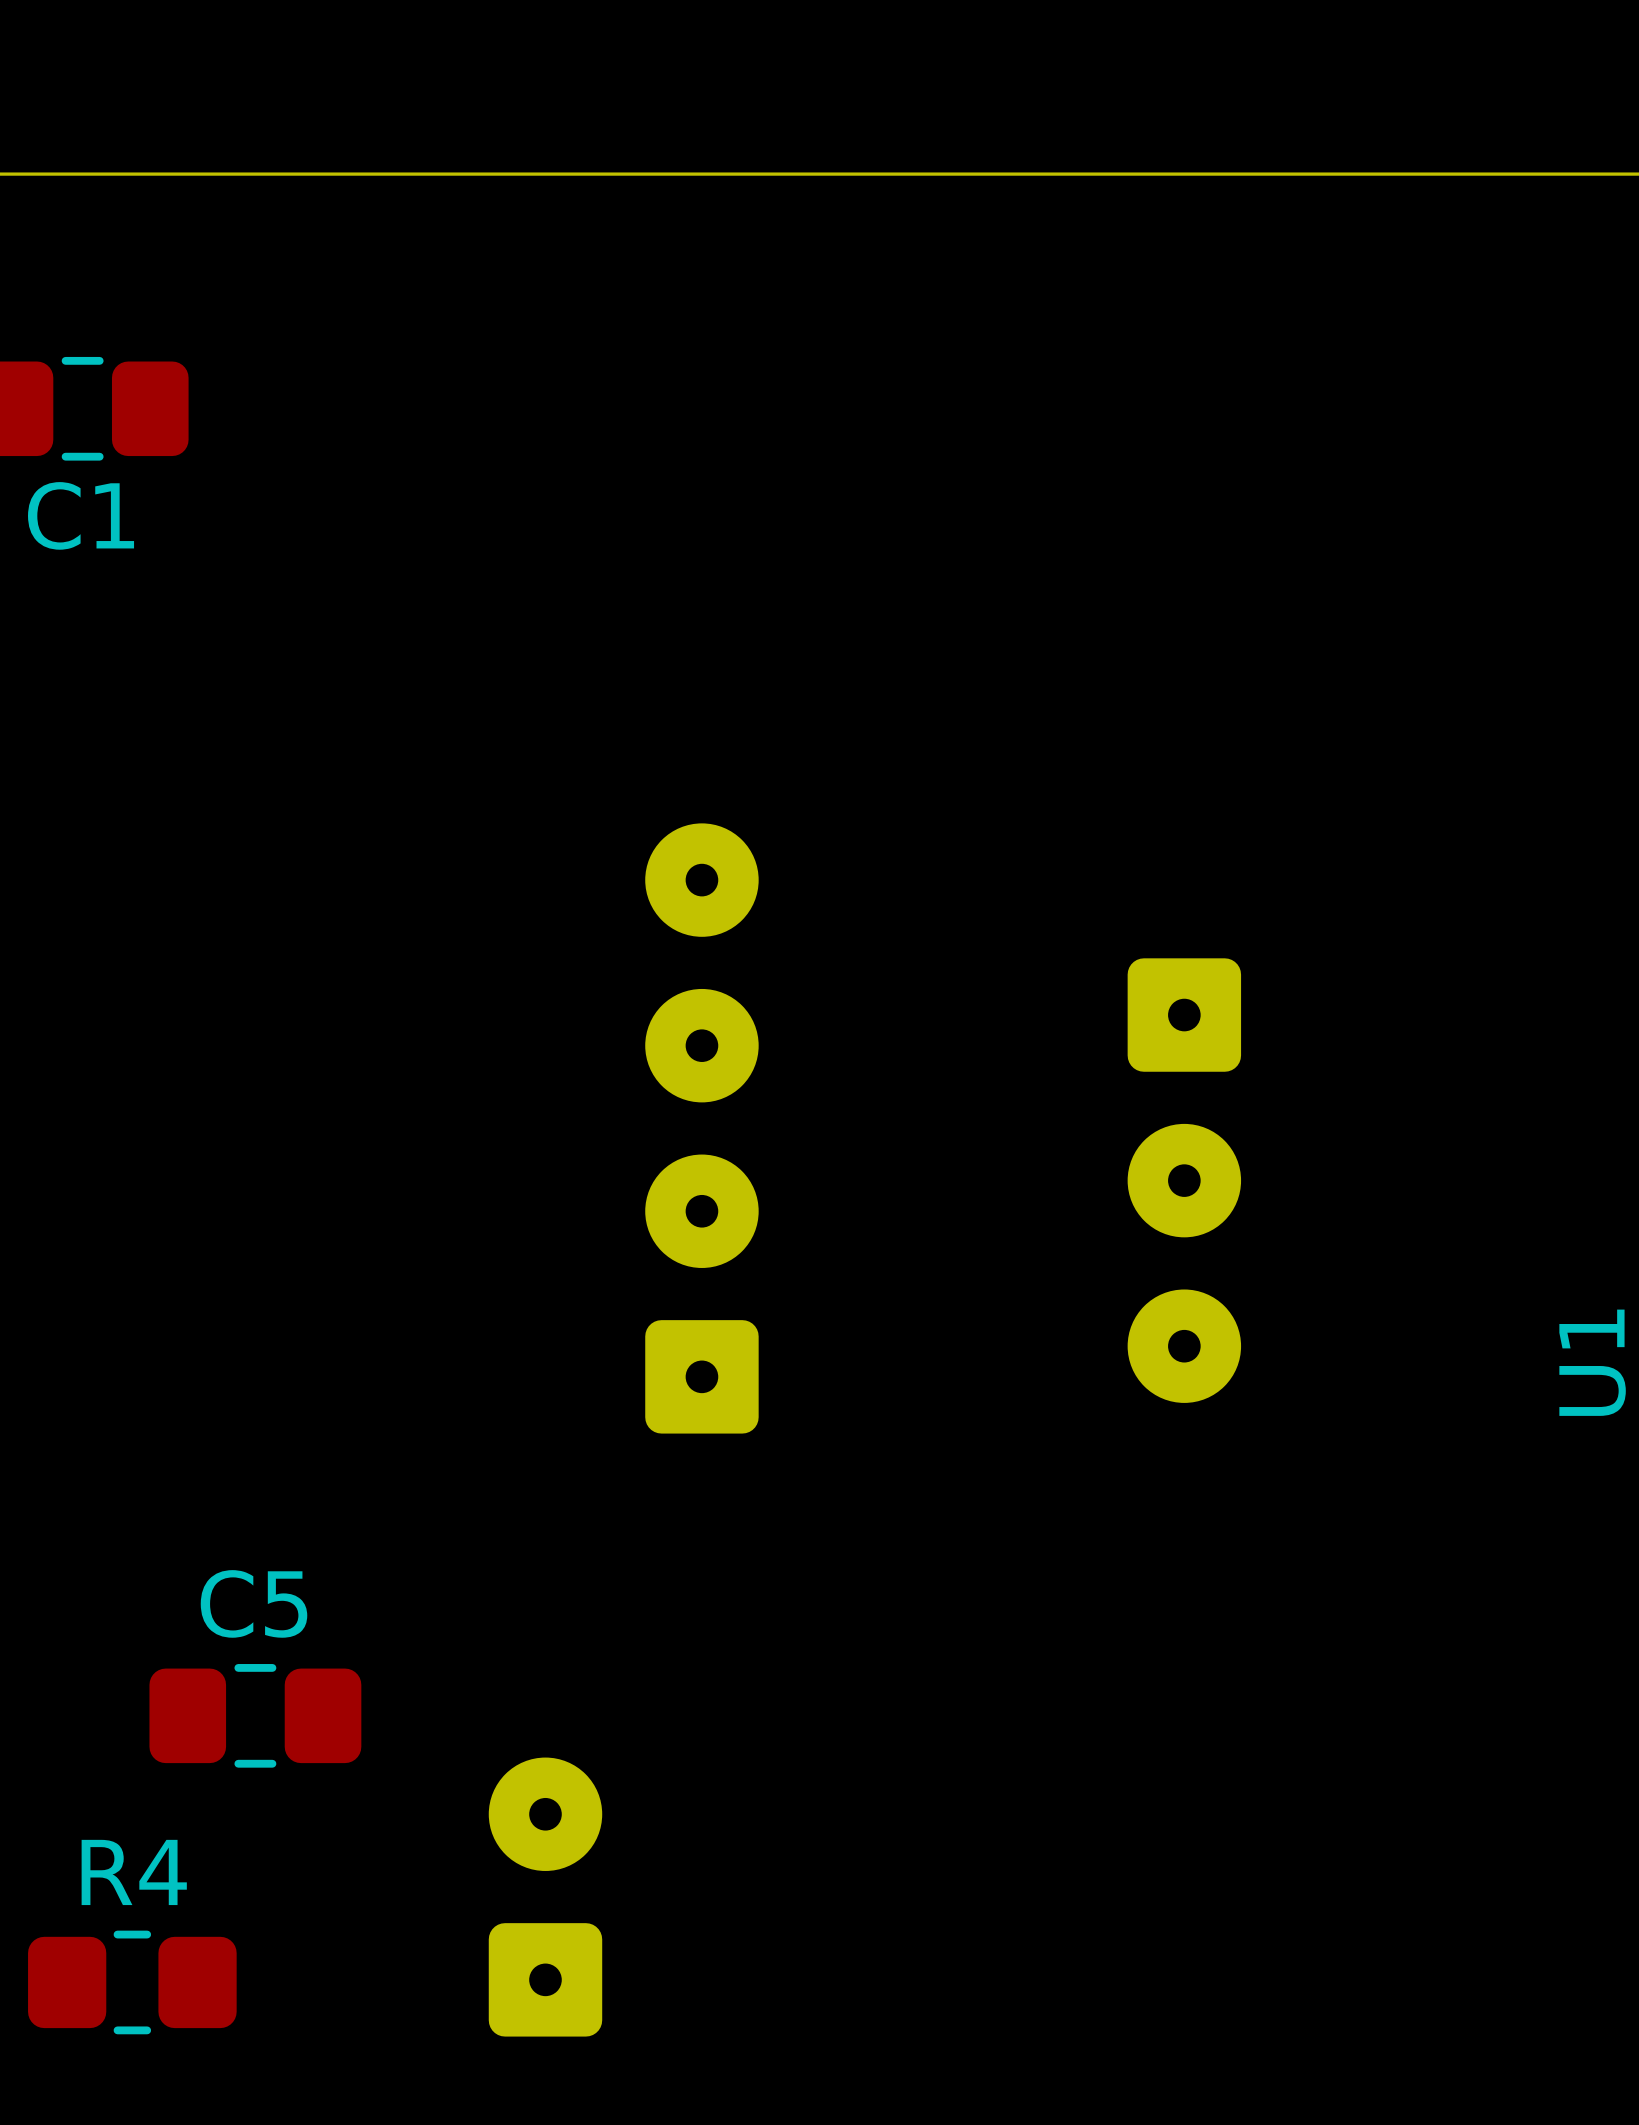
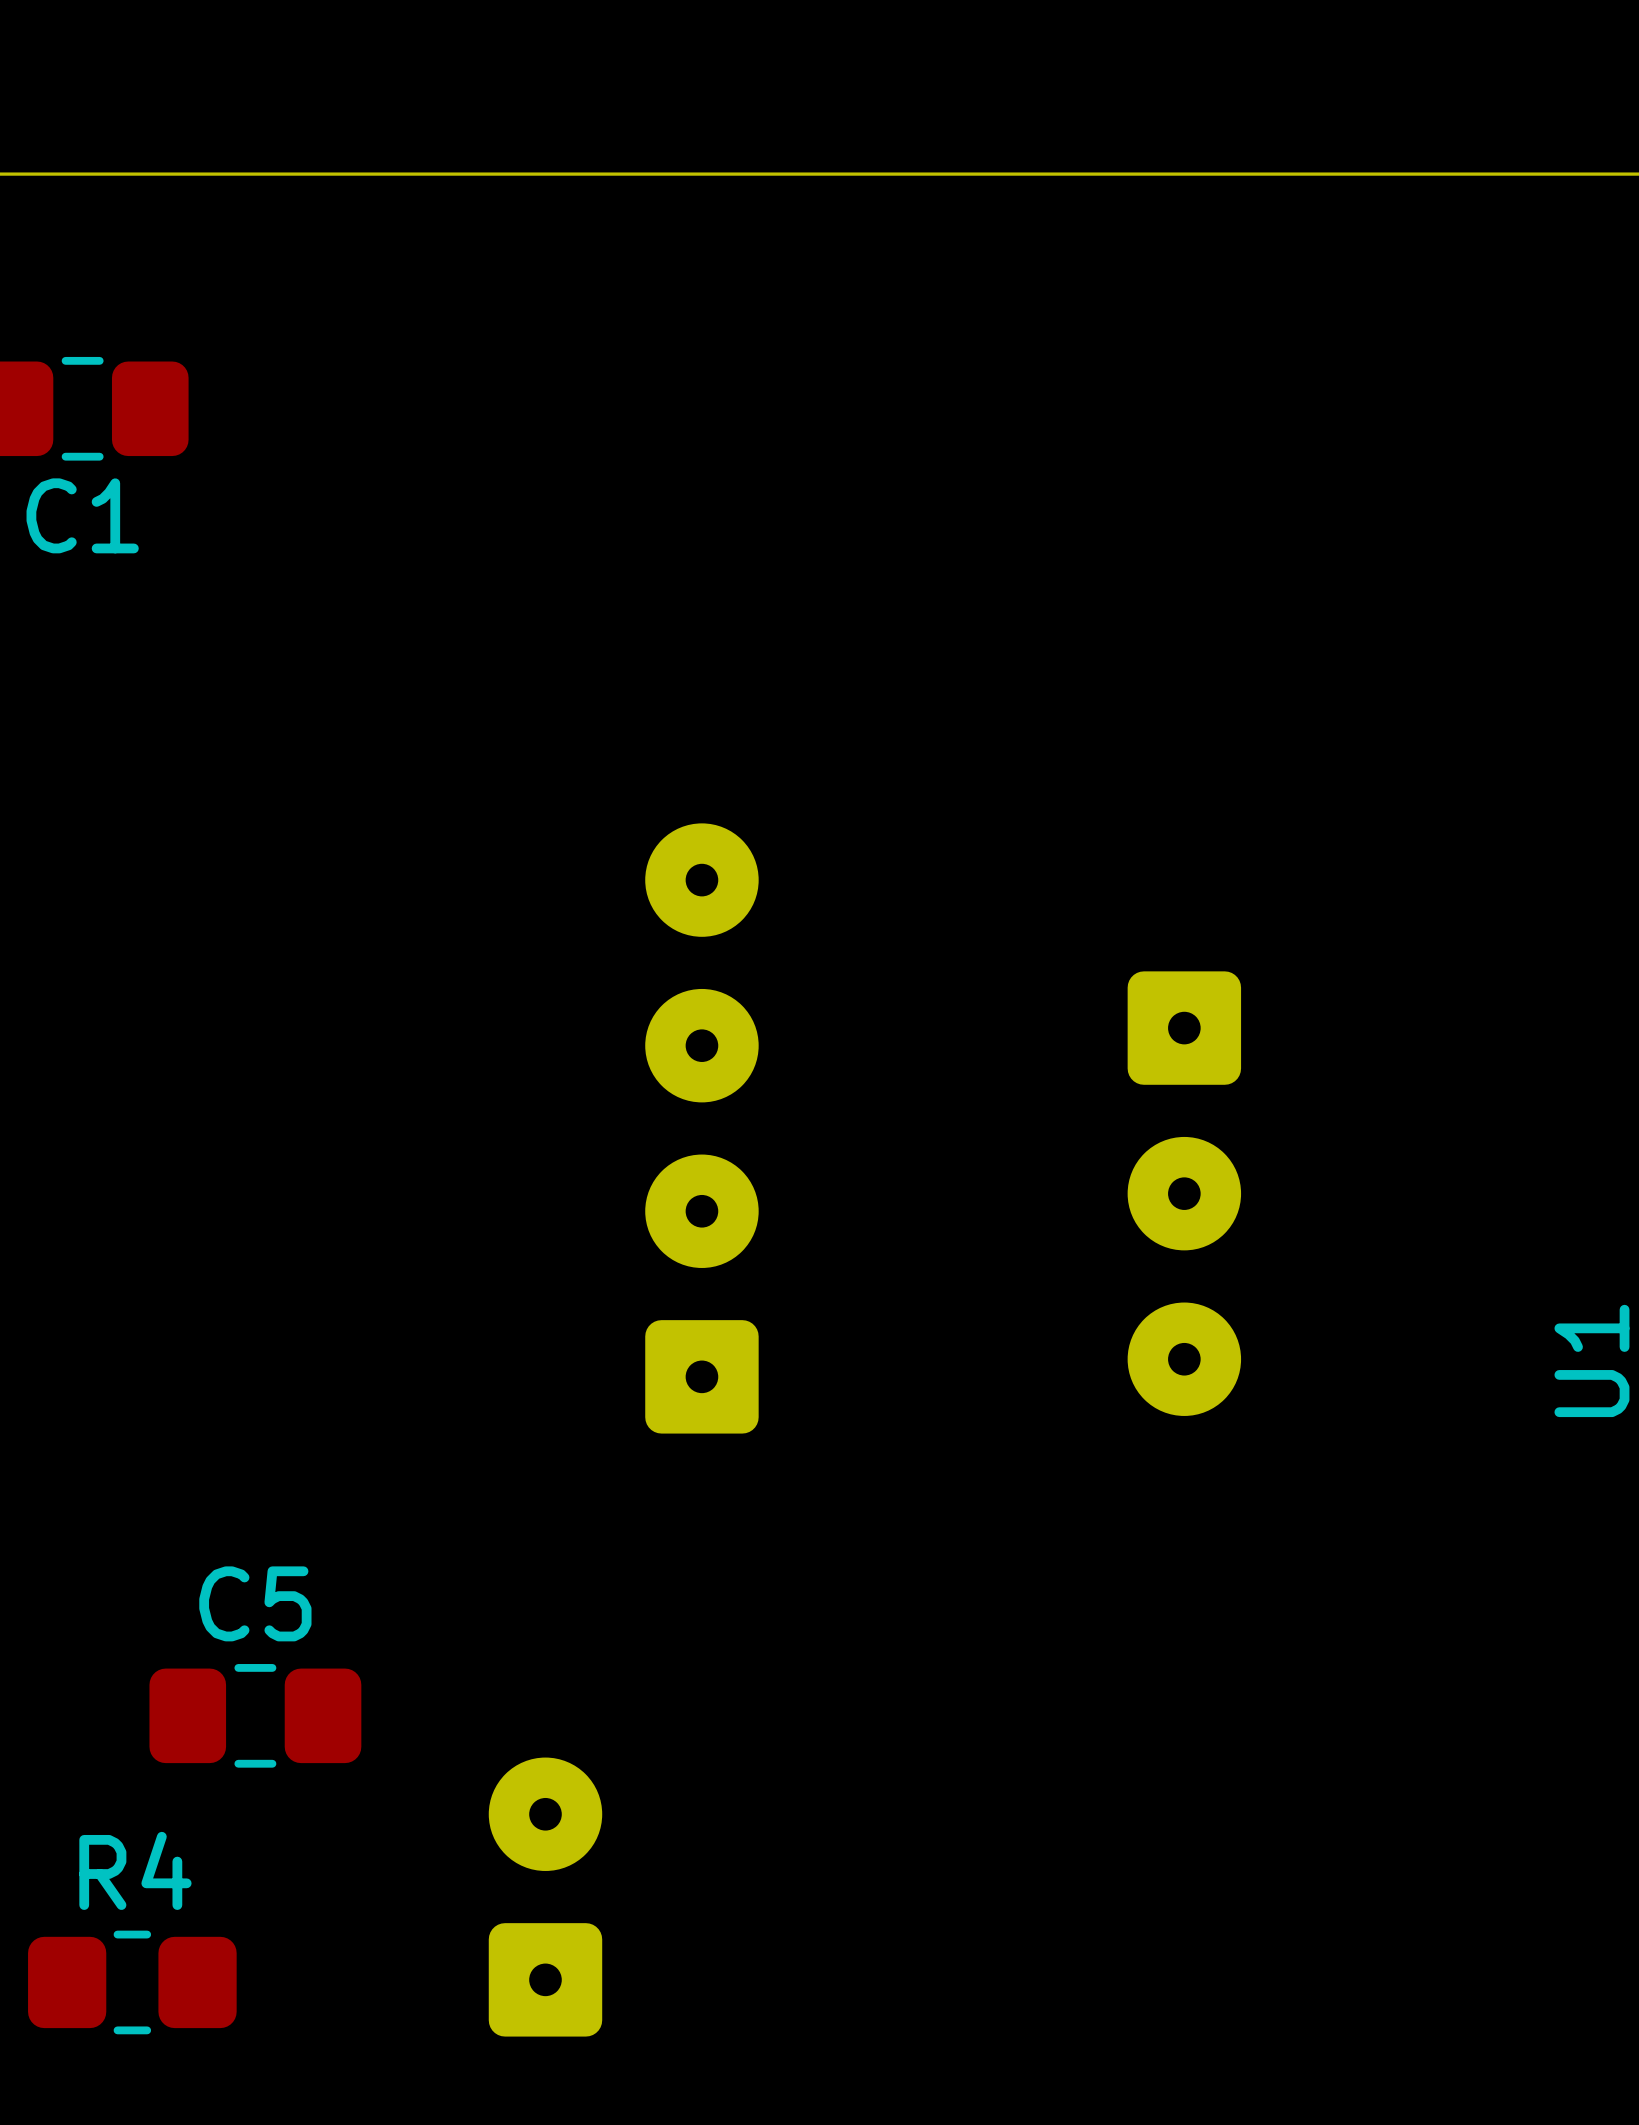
part position: (1184, 1180) -> (1184, 1193)

